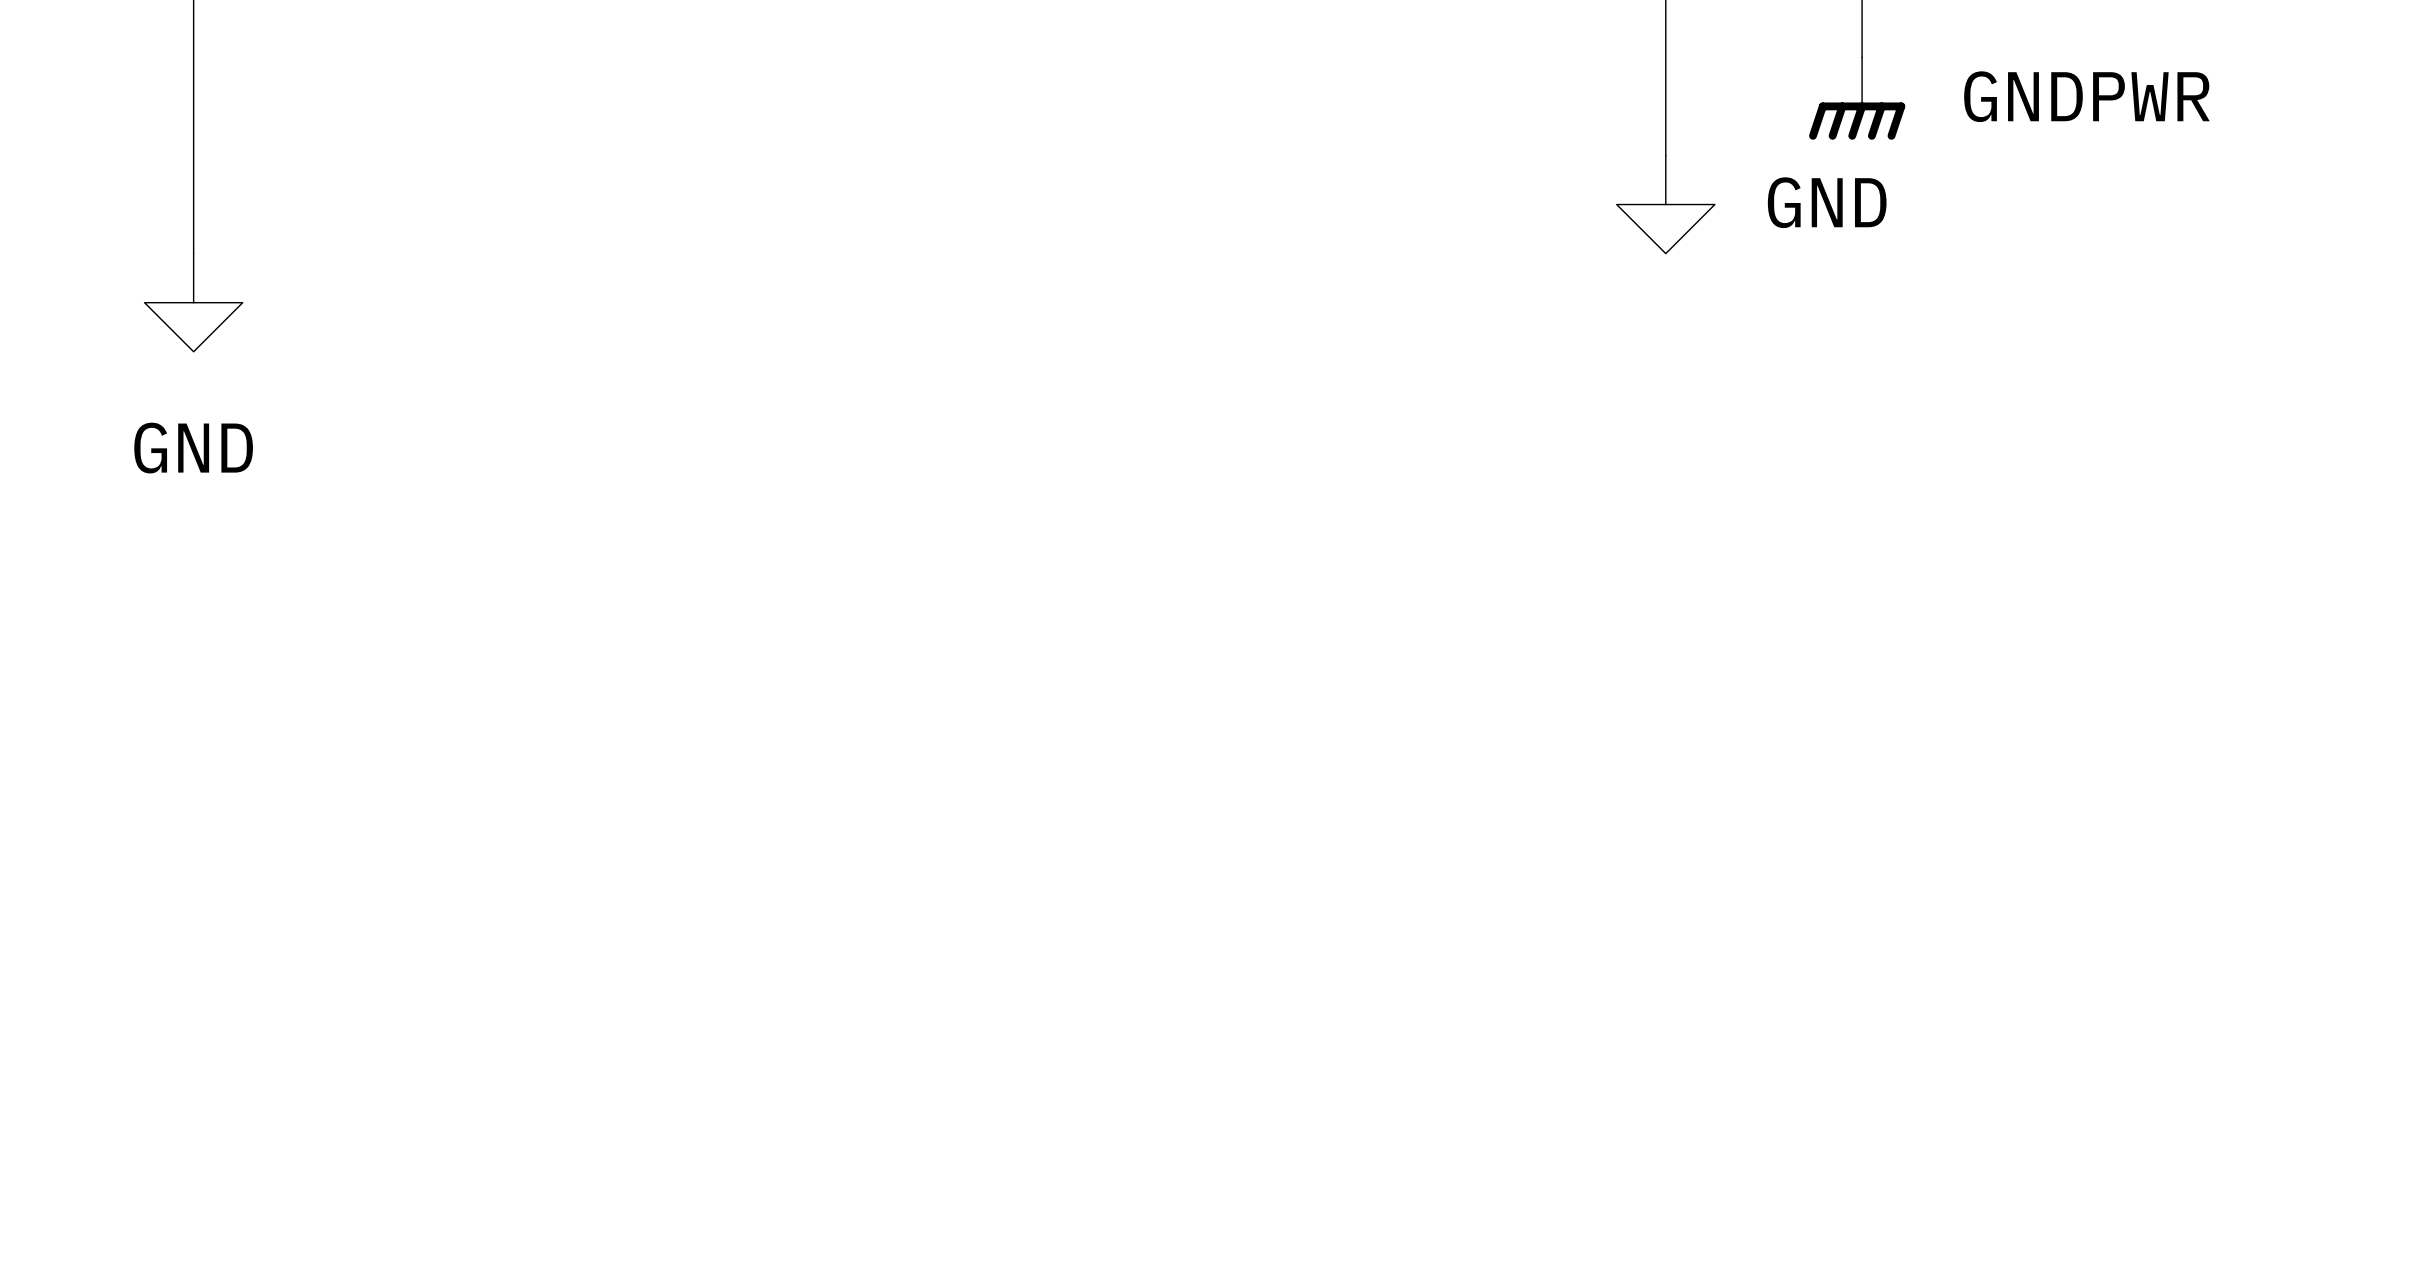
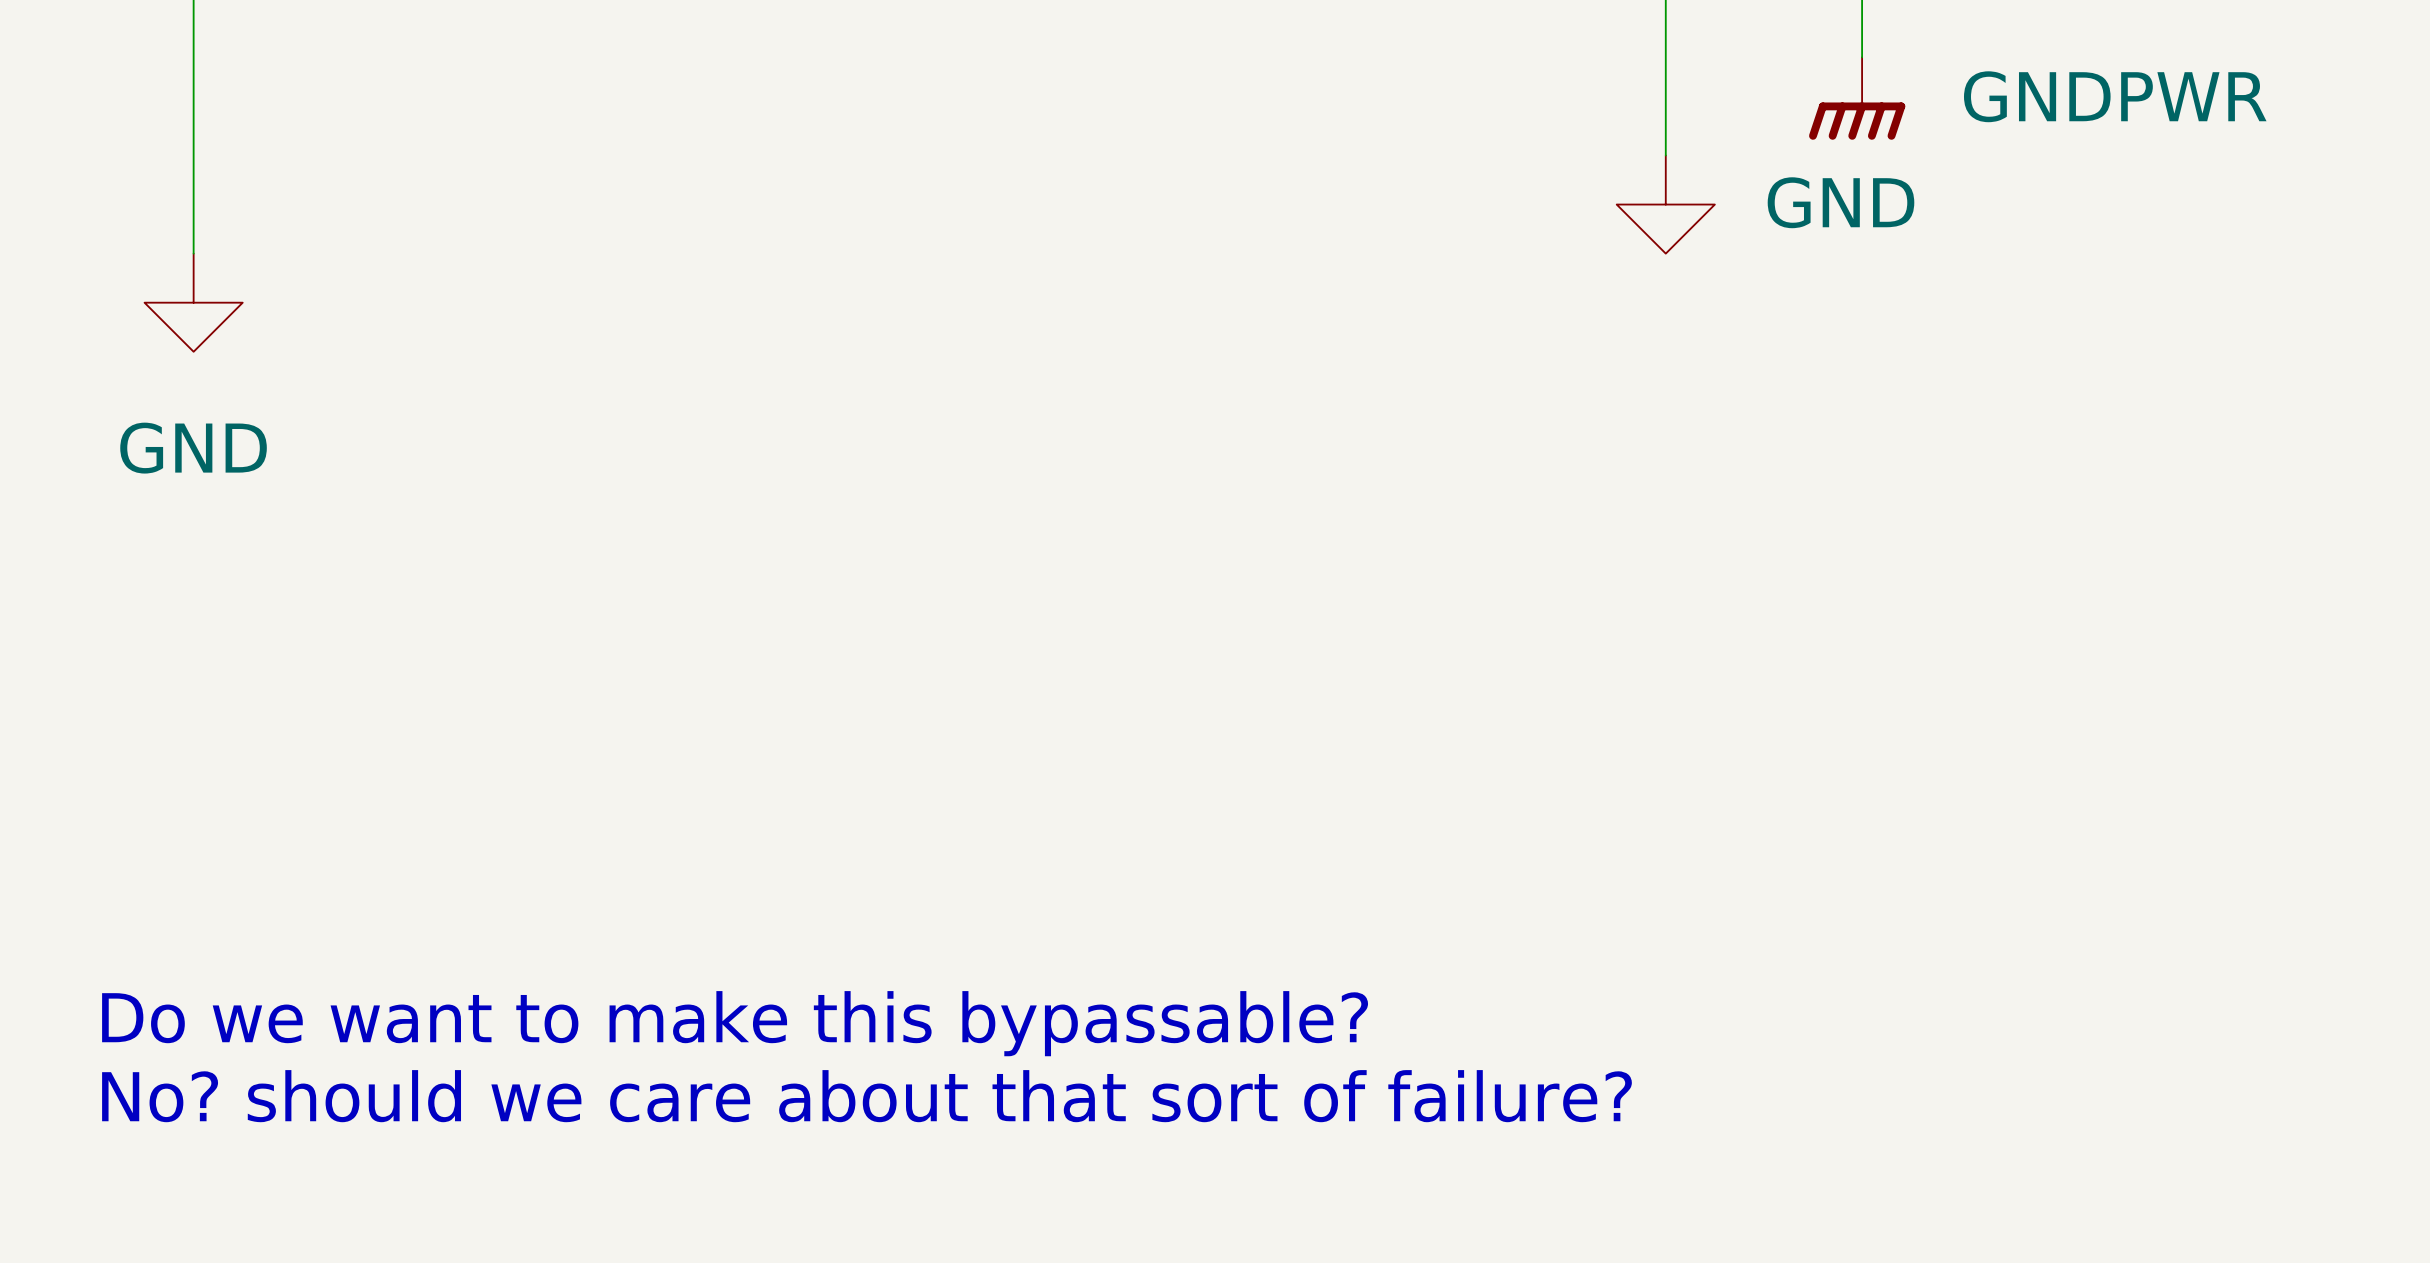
text: none -> Do we want to make this bypassable? (735, 1023)
text: none -> No? should we care about that sort of failure? (866, 1096)

